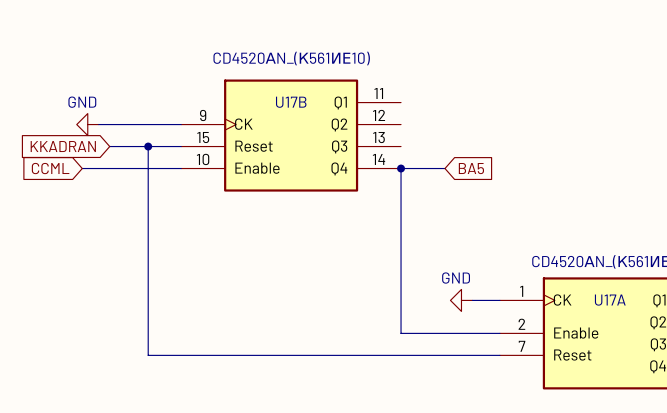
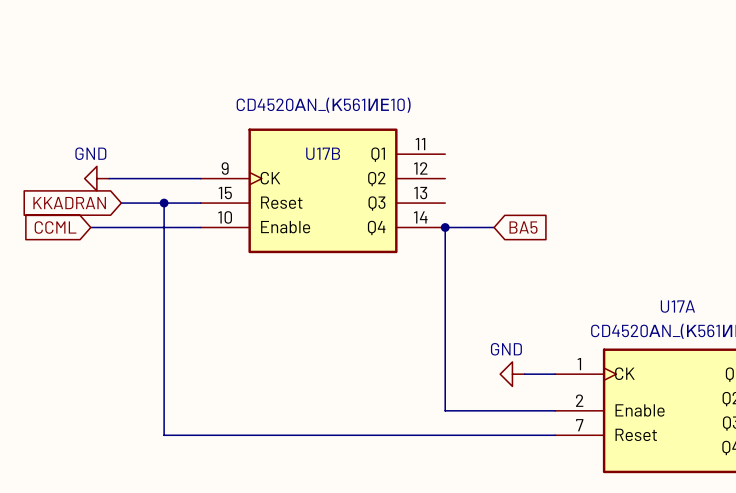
U17A name position: U17A (610, 300) -> U17A (677, 306)

